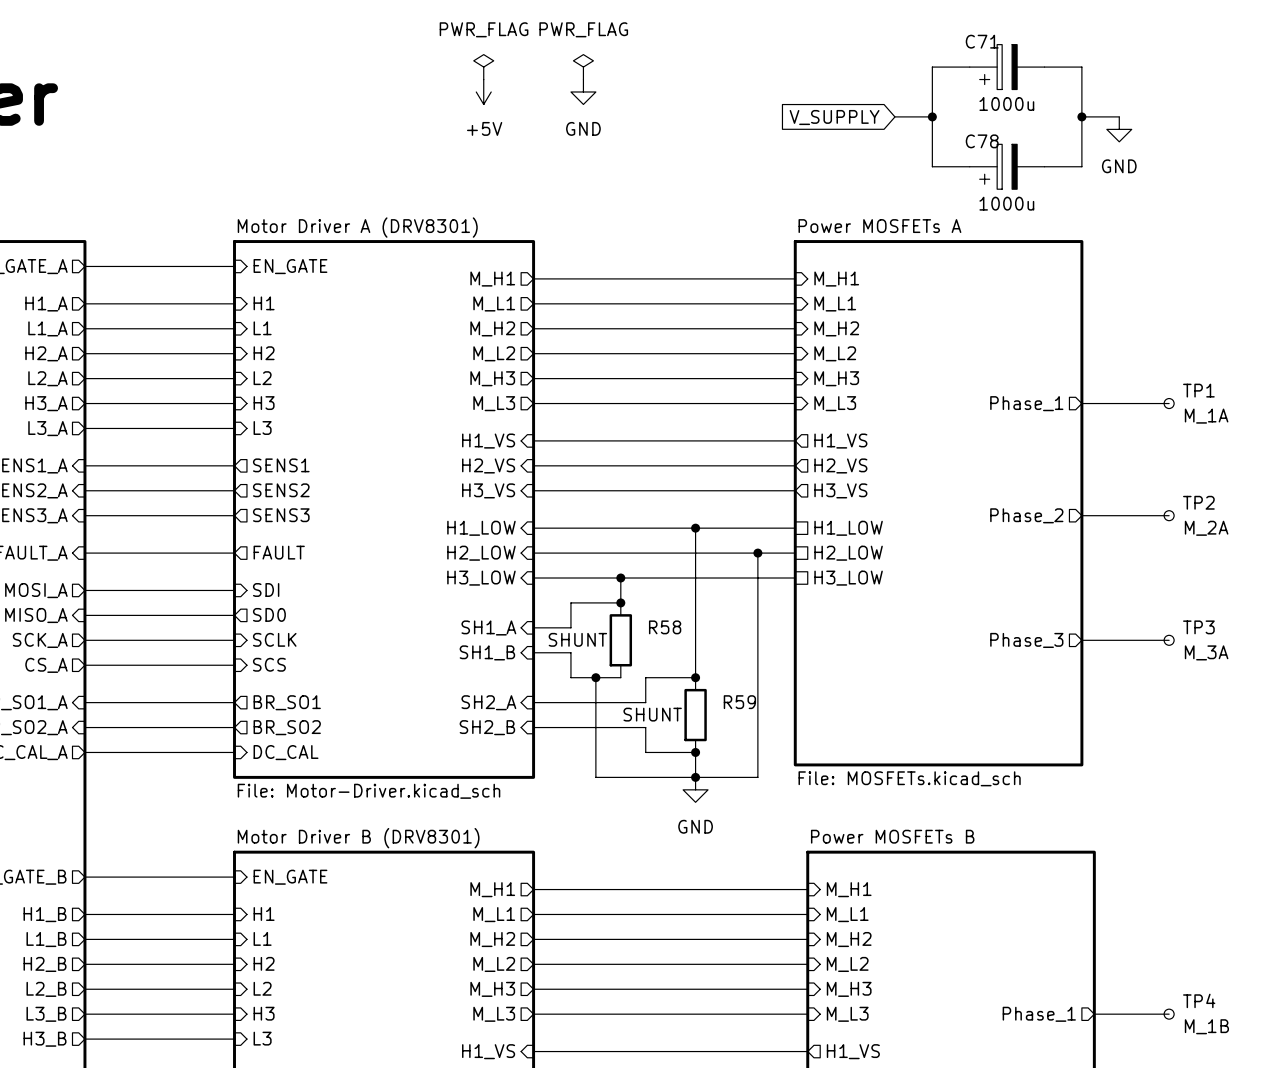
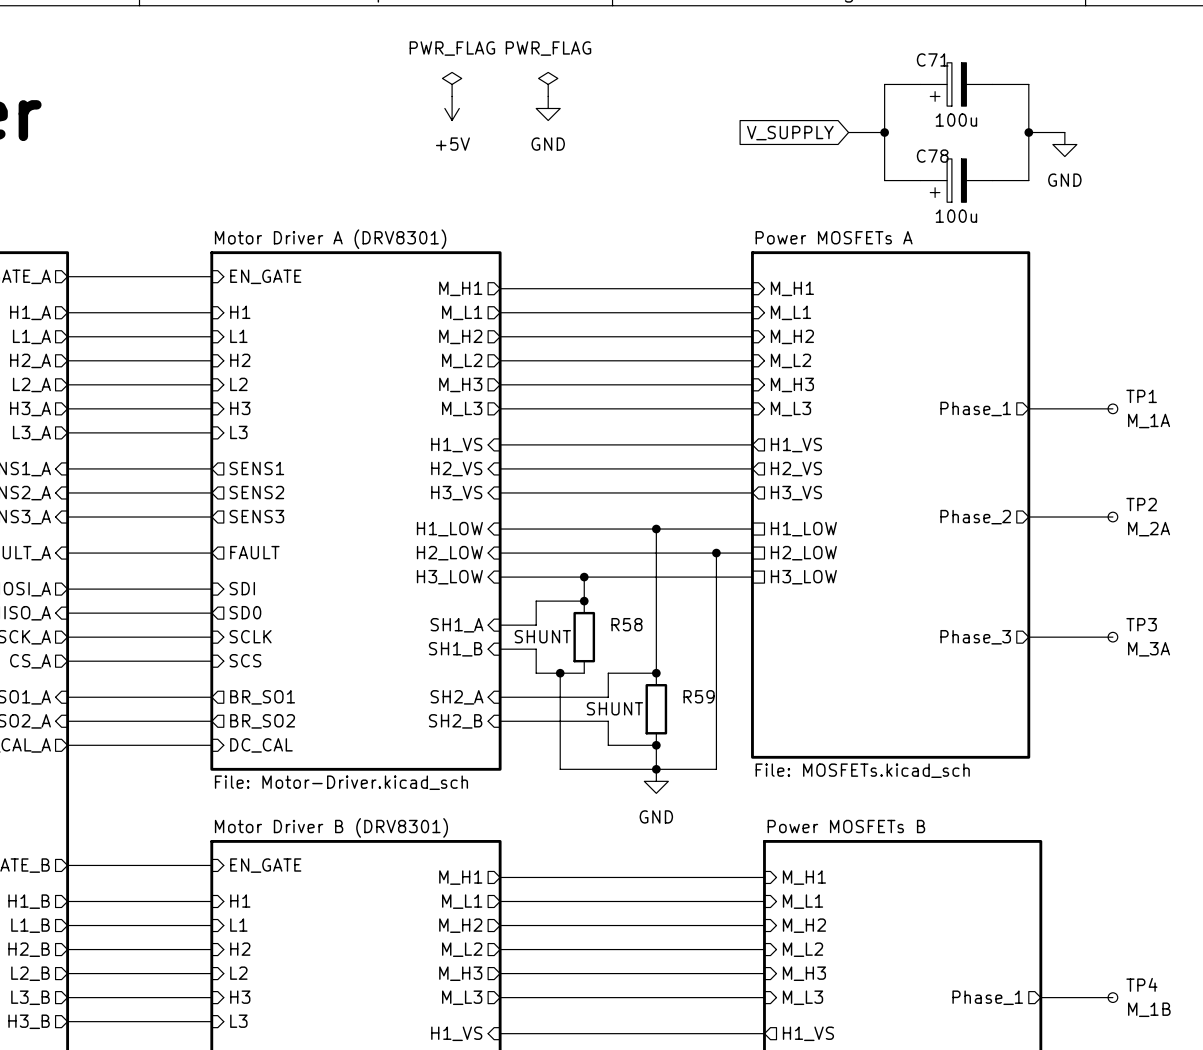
C71 value: 1000u (1006, 103) -> 100u (956, 120)
C78 value: 1000u (1006, 203) -> 100u (956, 216)

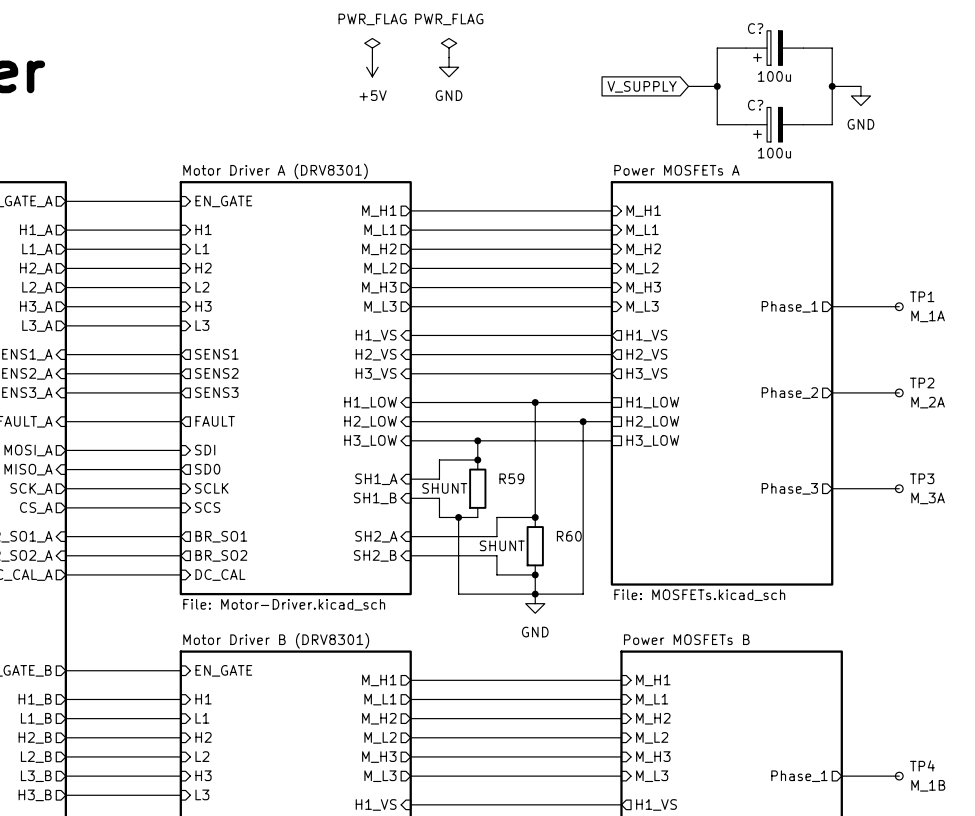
C71 name: C71 (932, 59) -> C? (755, 28)
C78 name: C78 (932, 156) -> C? (755, 105)
R58 name: R58 (626, 624) -> R59 (511, 478)
R59 name: R59 (699, 696) -> R60 (569, 536)

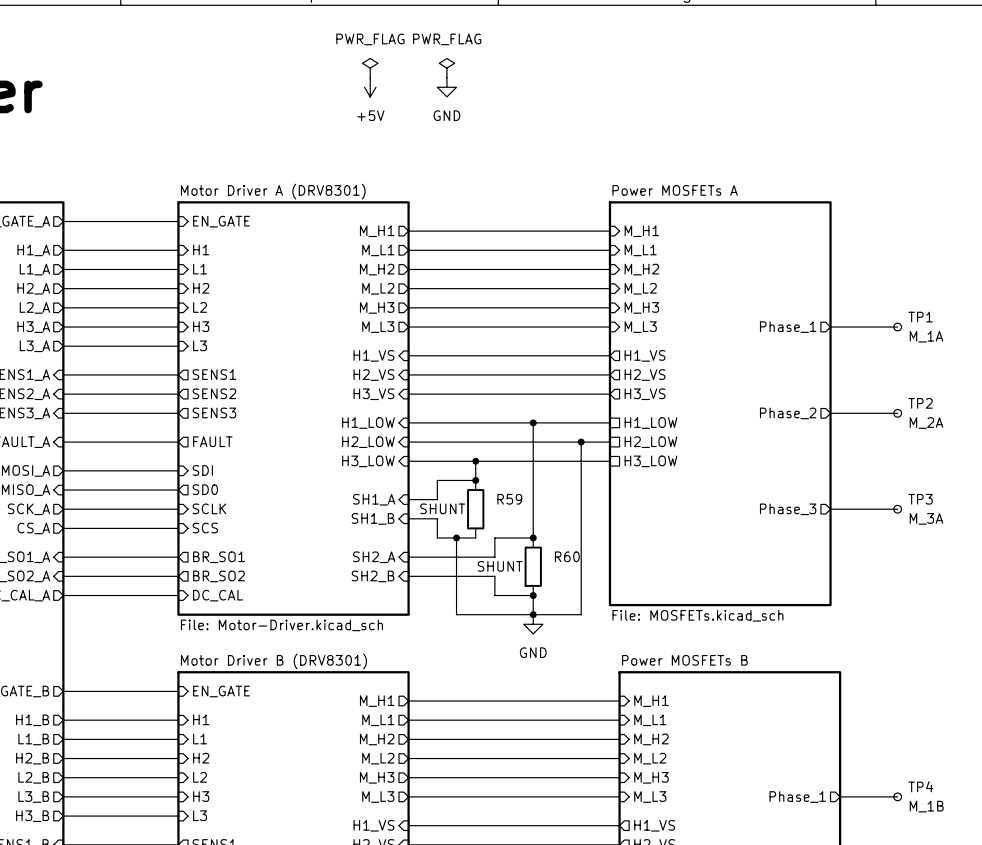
wire: (746, 48) (717, 48) (717, 124) (746, 124) -> none
C?: 100u (774, 48) -> none
wire: (803, 48) (832, 48) (832, 124) (803, 124) -> none
global label: V_SUPPLY (642, 86) -> none
wire: (688, 86) (717, 86) -> none
junction: (717, 86) -> none
wire: (832, 86) (860, 86) -> none
junction: (832, 86) -> none
power symbol: GND (860, 95) -> none
C?: 100u (774, 124) -> none

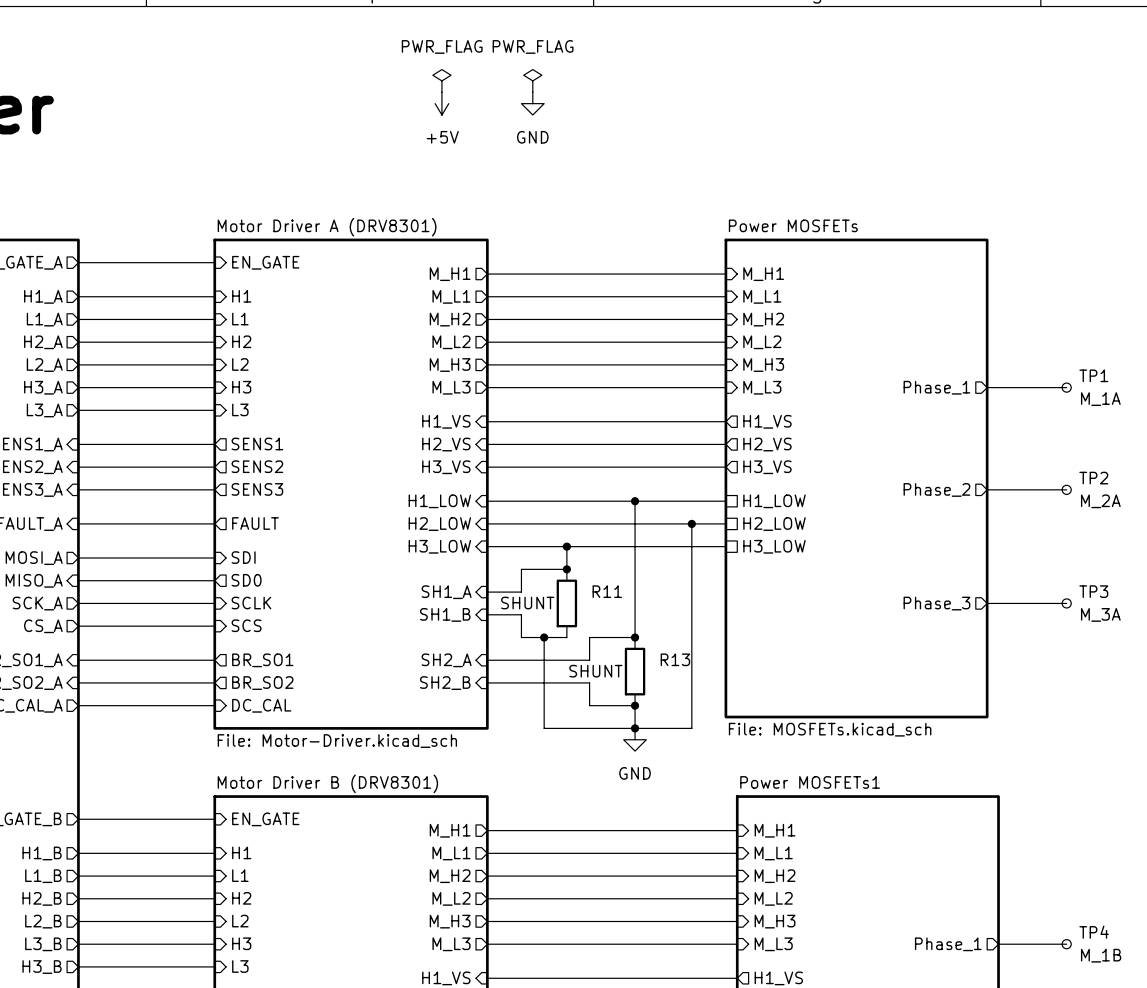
sheet Power MOSFETs A name: Power MOSFETs A (675, 190) -> Power MOSFETs (793, 225)
R59 name: R59 (509, 499) -> R11 (607, 591)
R60 name: R60 (567, 556) -> R13 (675, 659)
sheet Power MOSFETs B name: Power MOSFETs B (684, 660) -> Power MOSFETs1 (810, 782)

